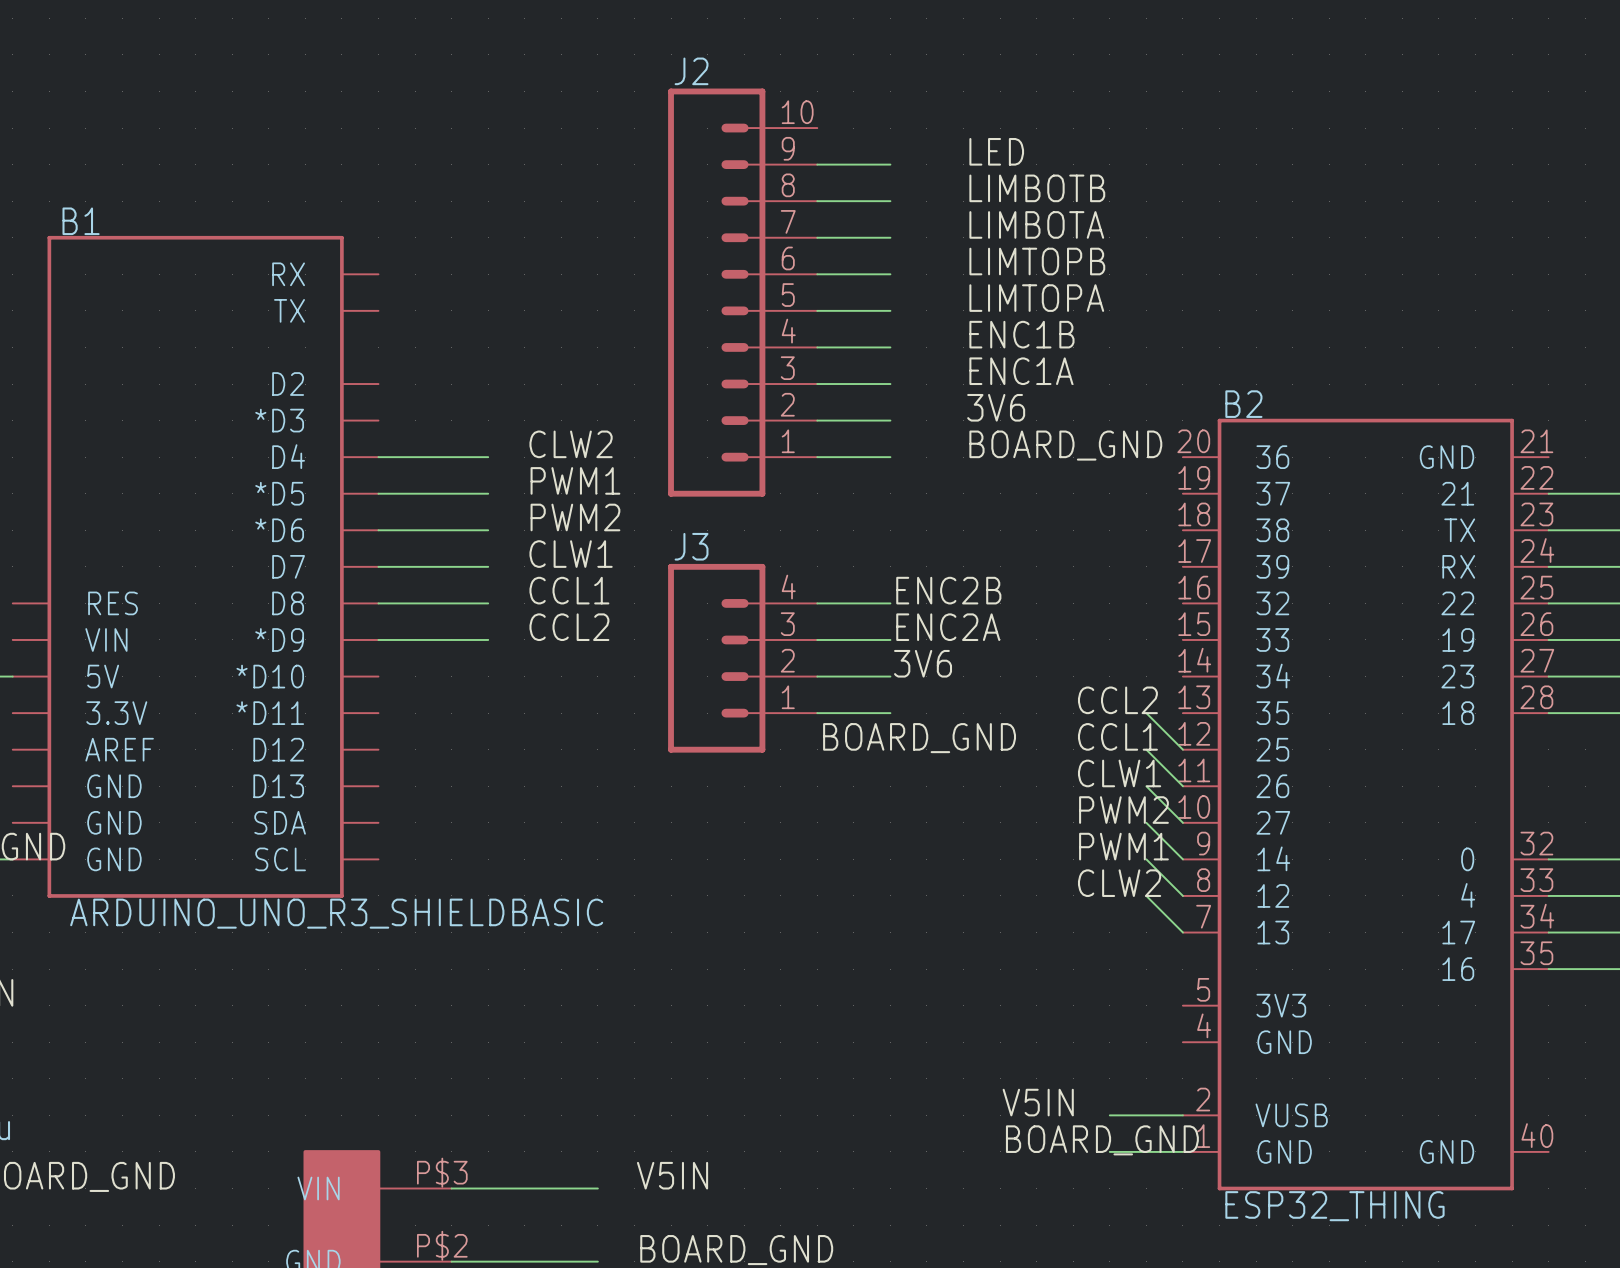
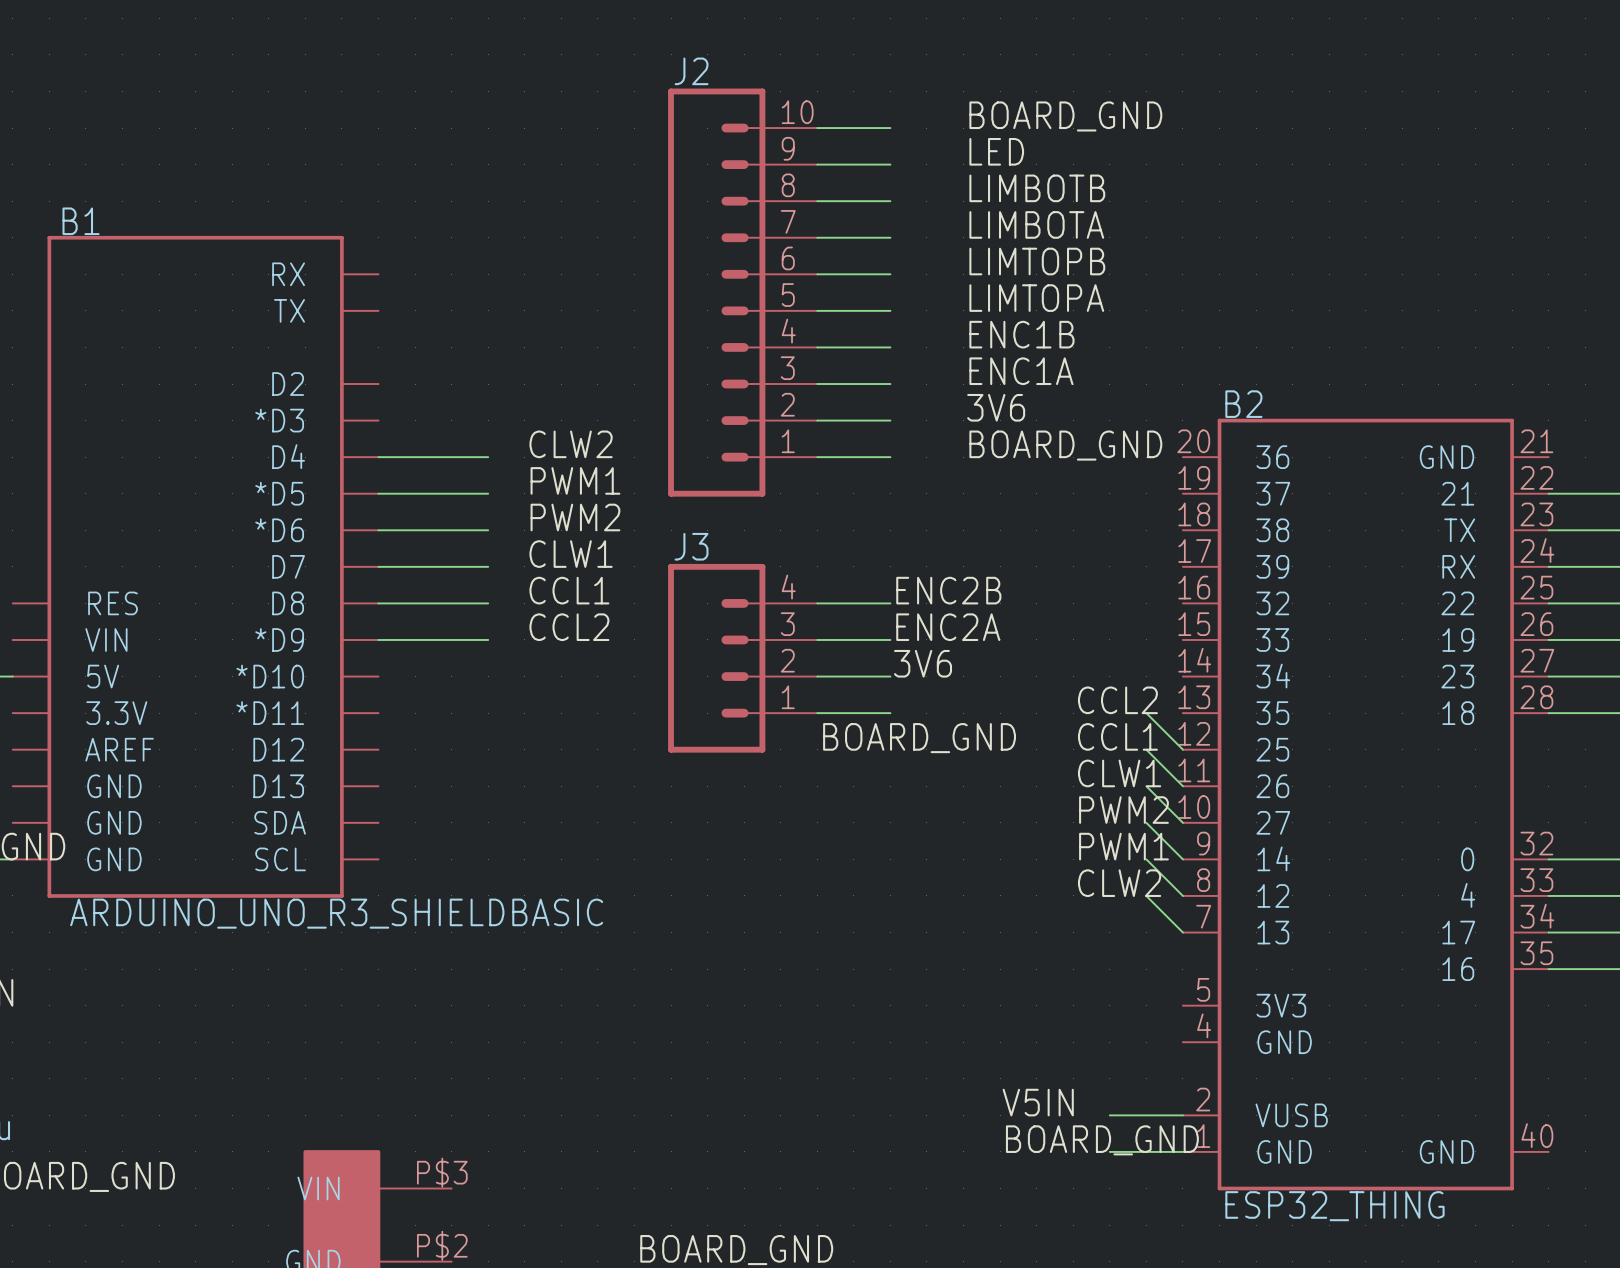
label: none -> BOARD_GND (1065, 116)
wire: none -> (817, 128) (890, 128)
label: V5IN (672, 1175) -> none
wire: (451, 1188) (597, 1188) -> none
wire: (451, 1261) (597, 1261) -> none

